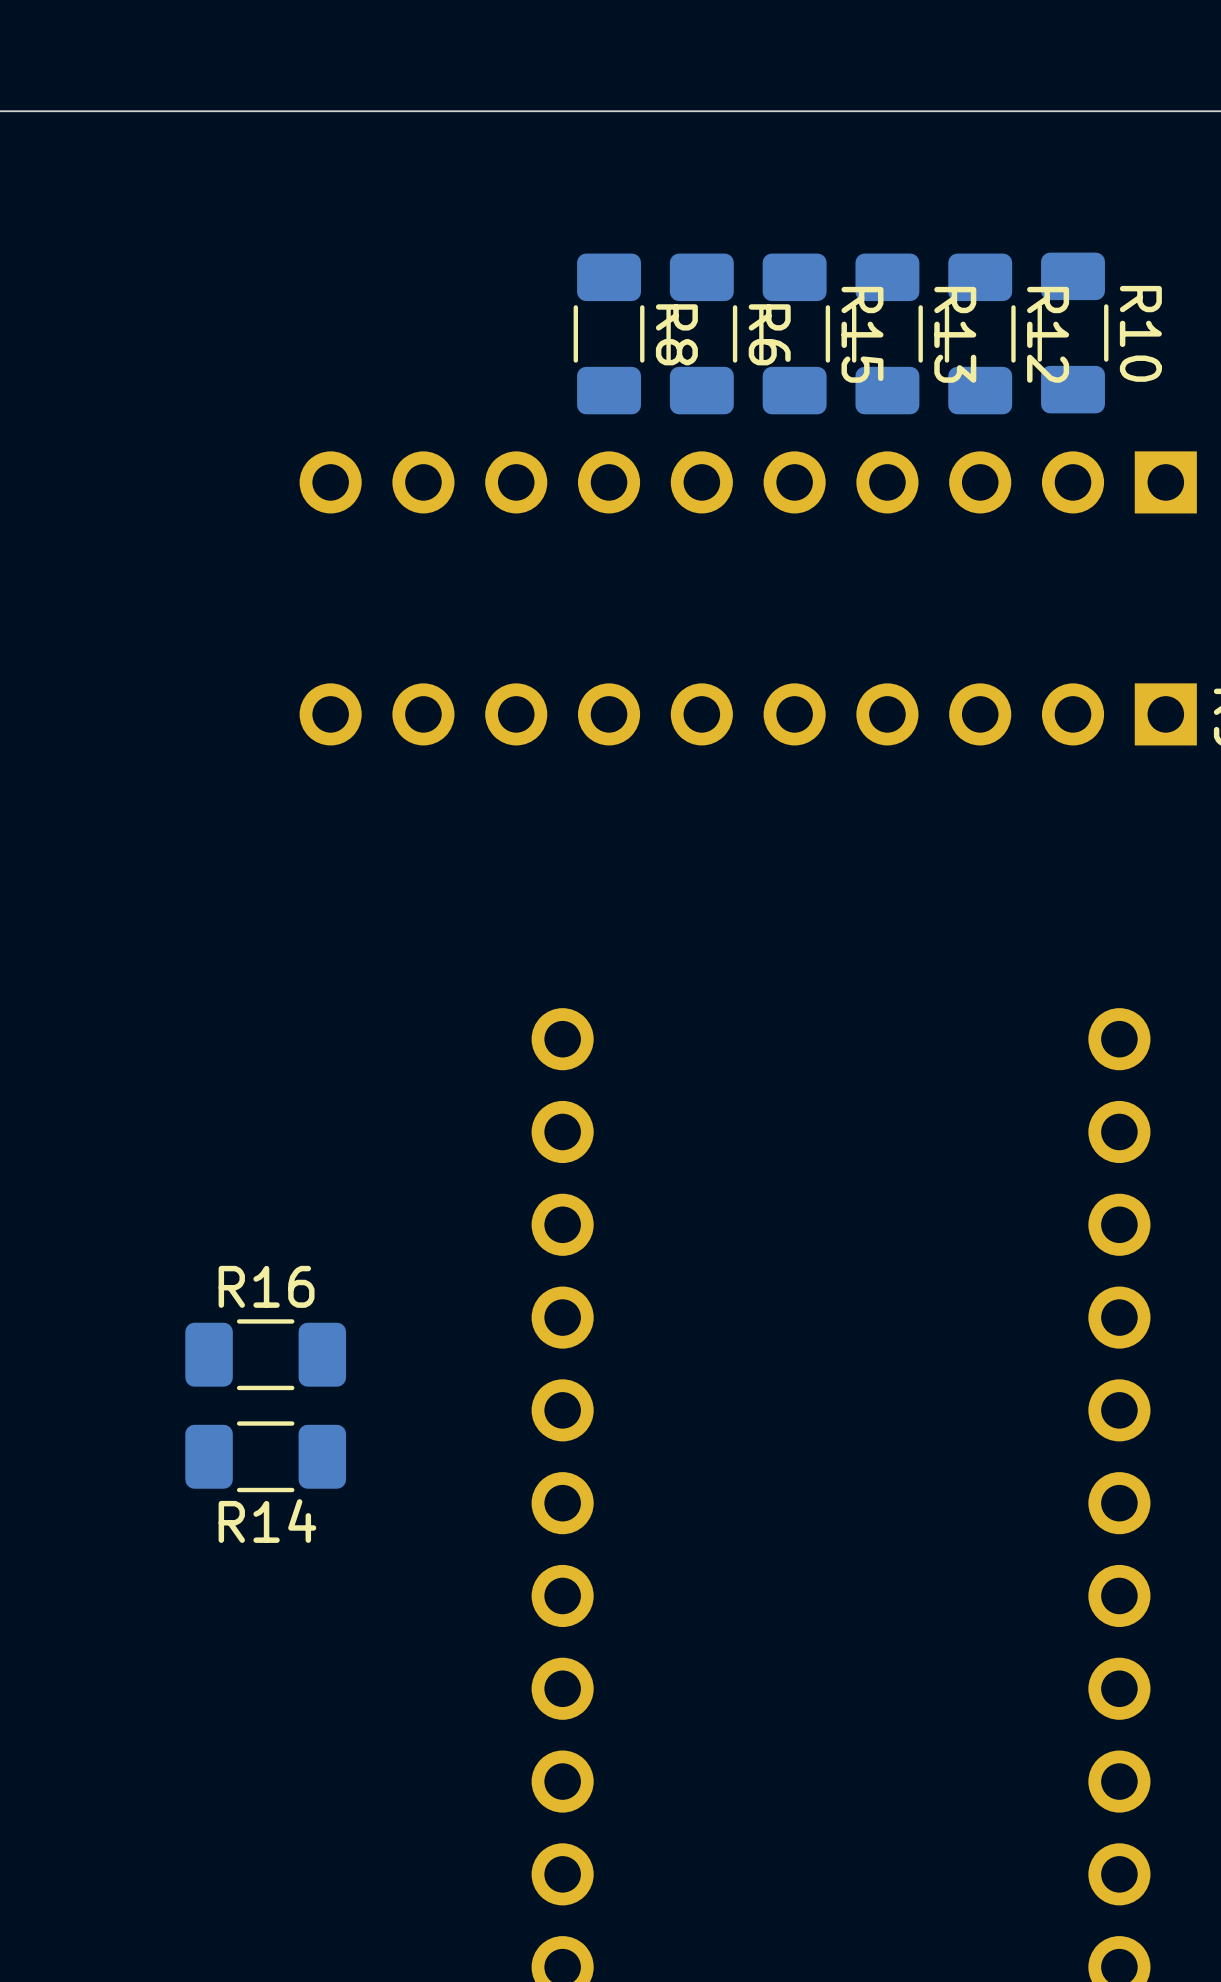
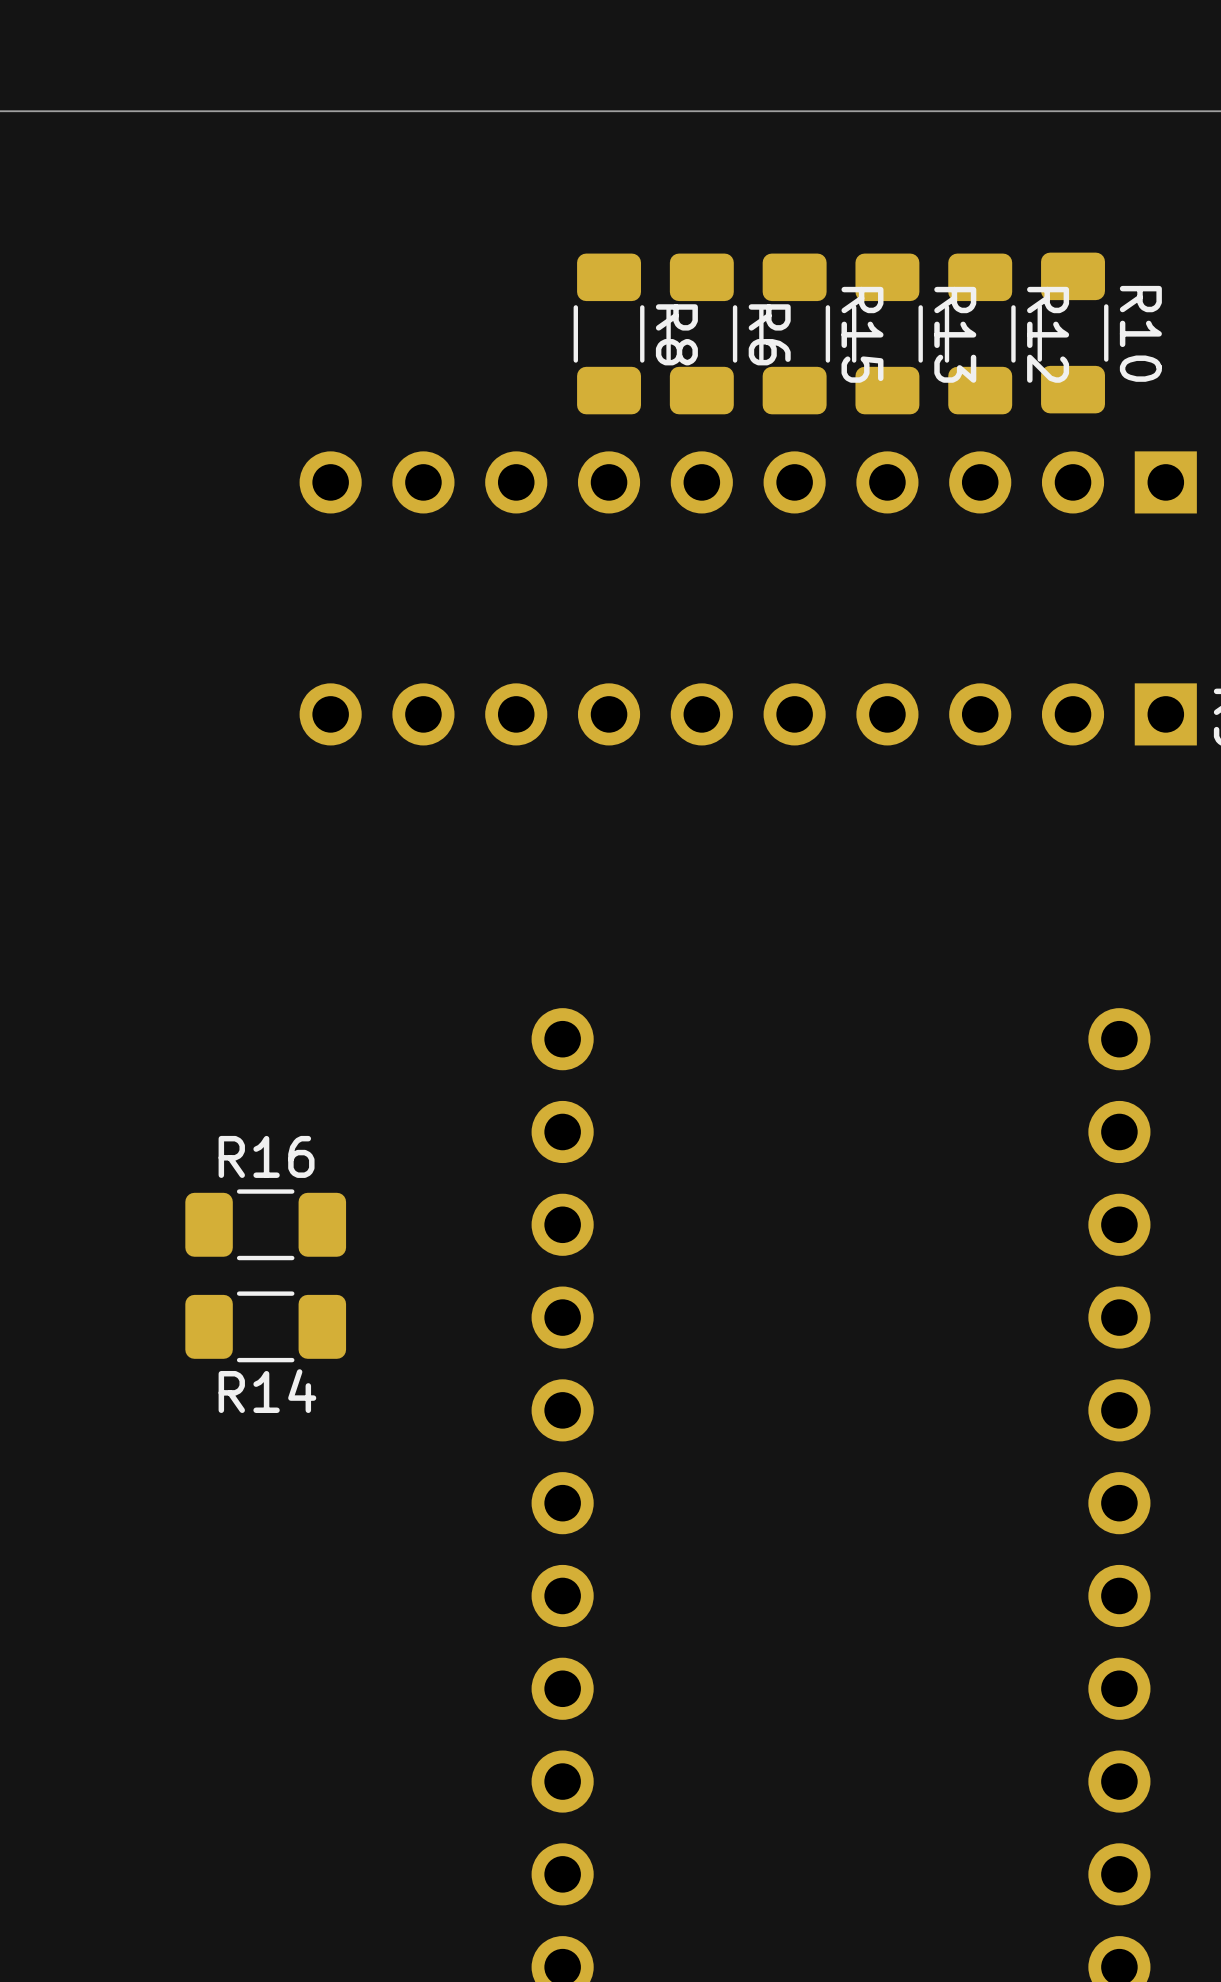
R16 position: (265, 1354) -> (265, 1224)
R14 position: (265, 1456) -> (265, 1326)

